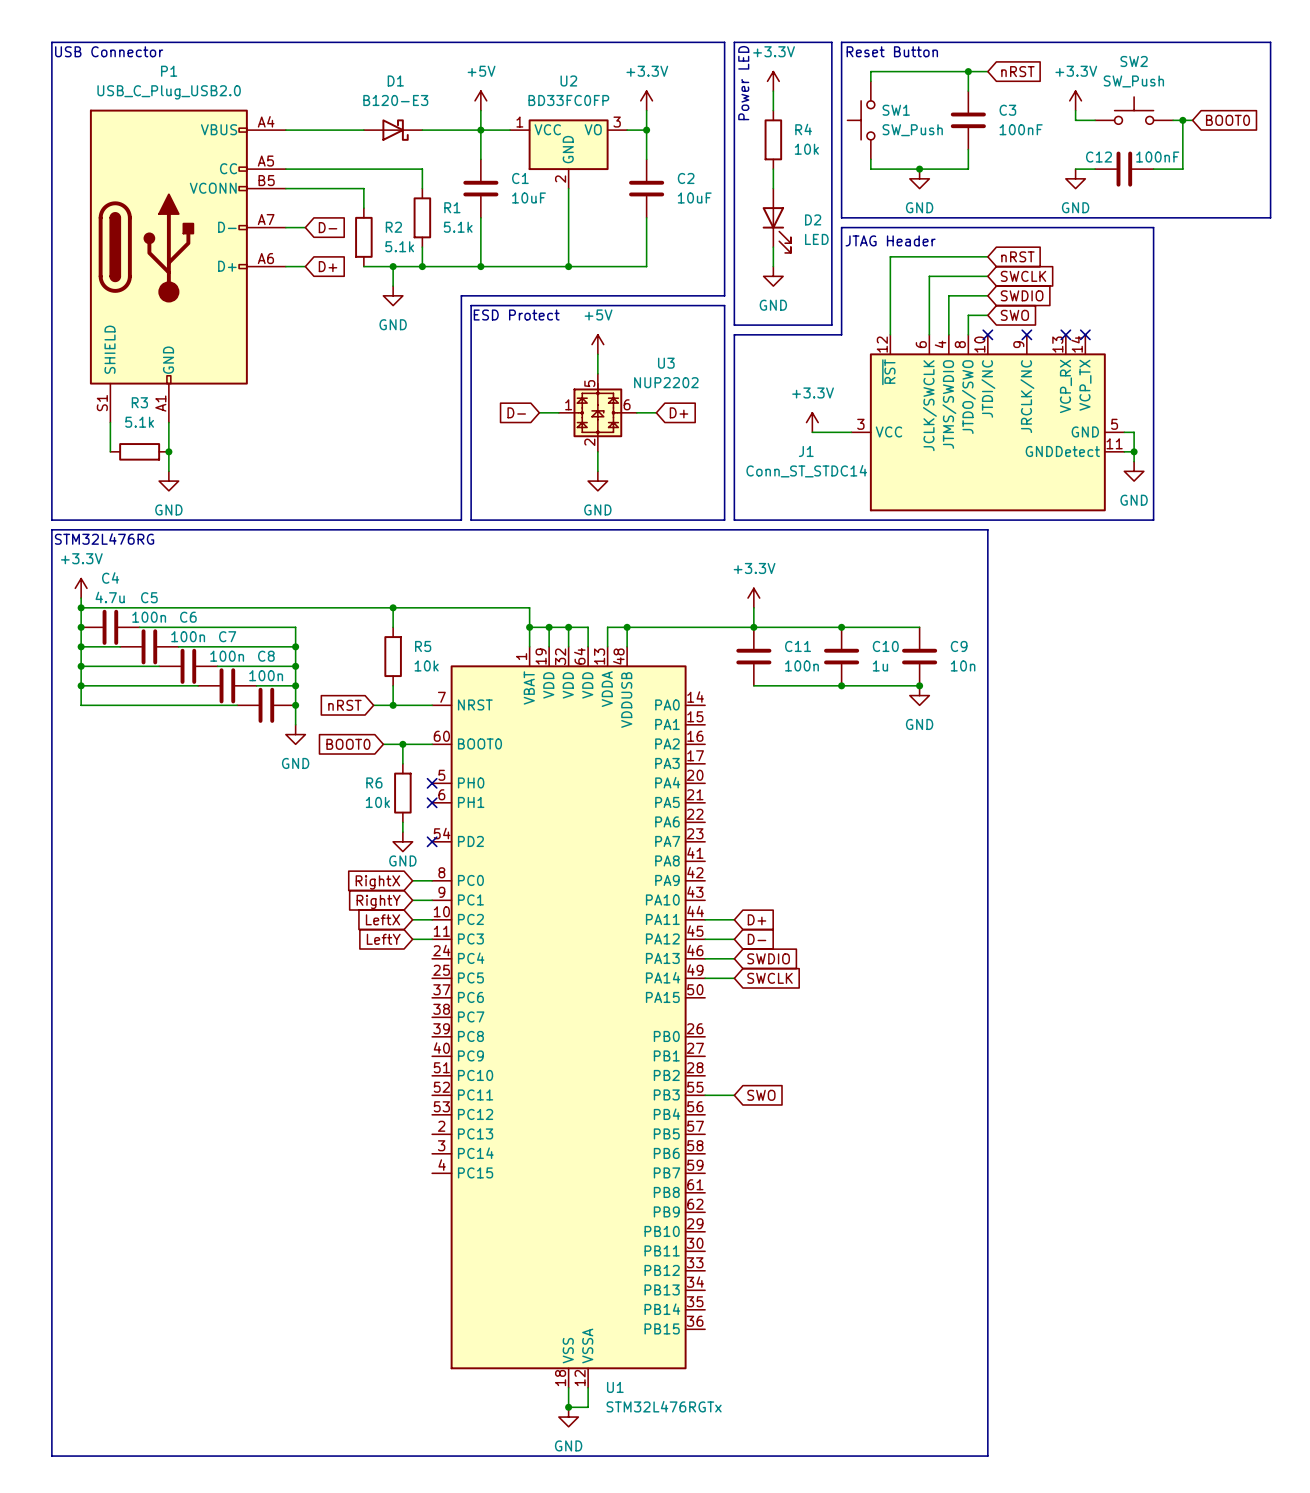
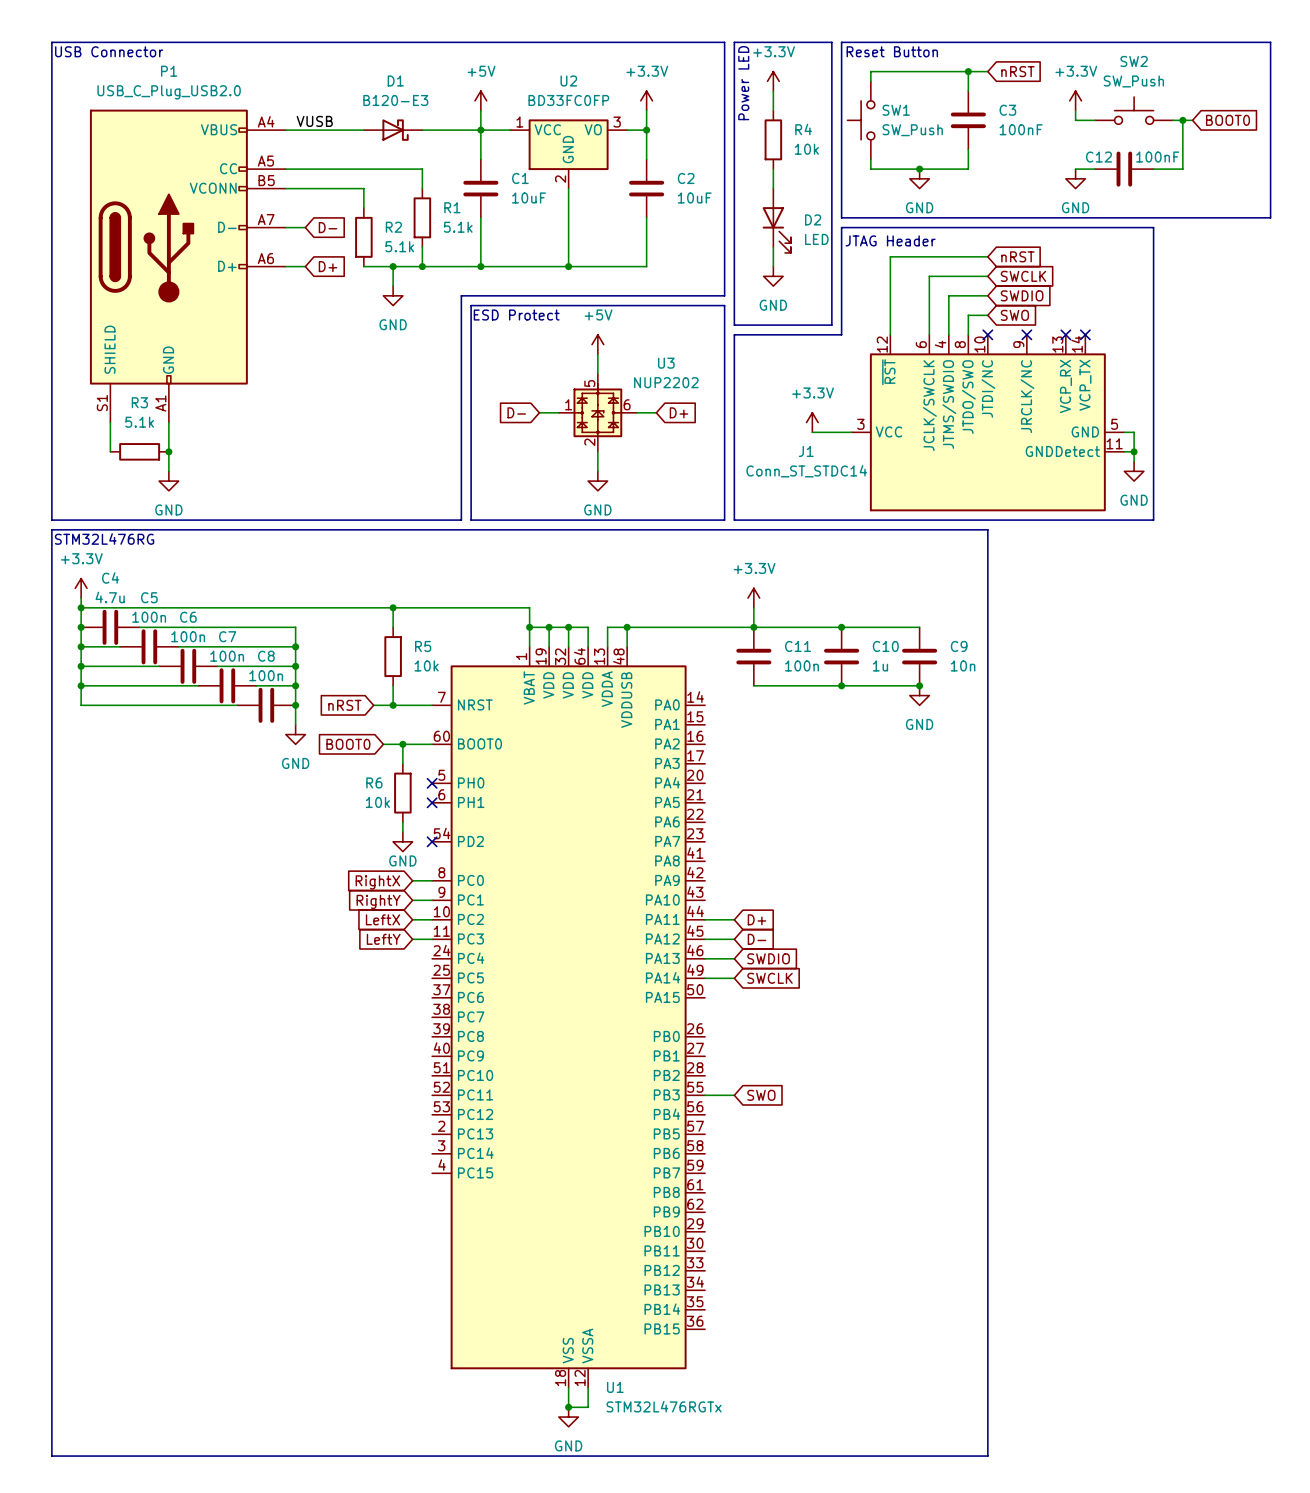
label: none -> VUSB (314, 121)

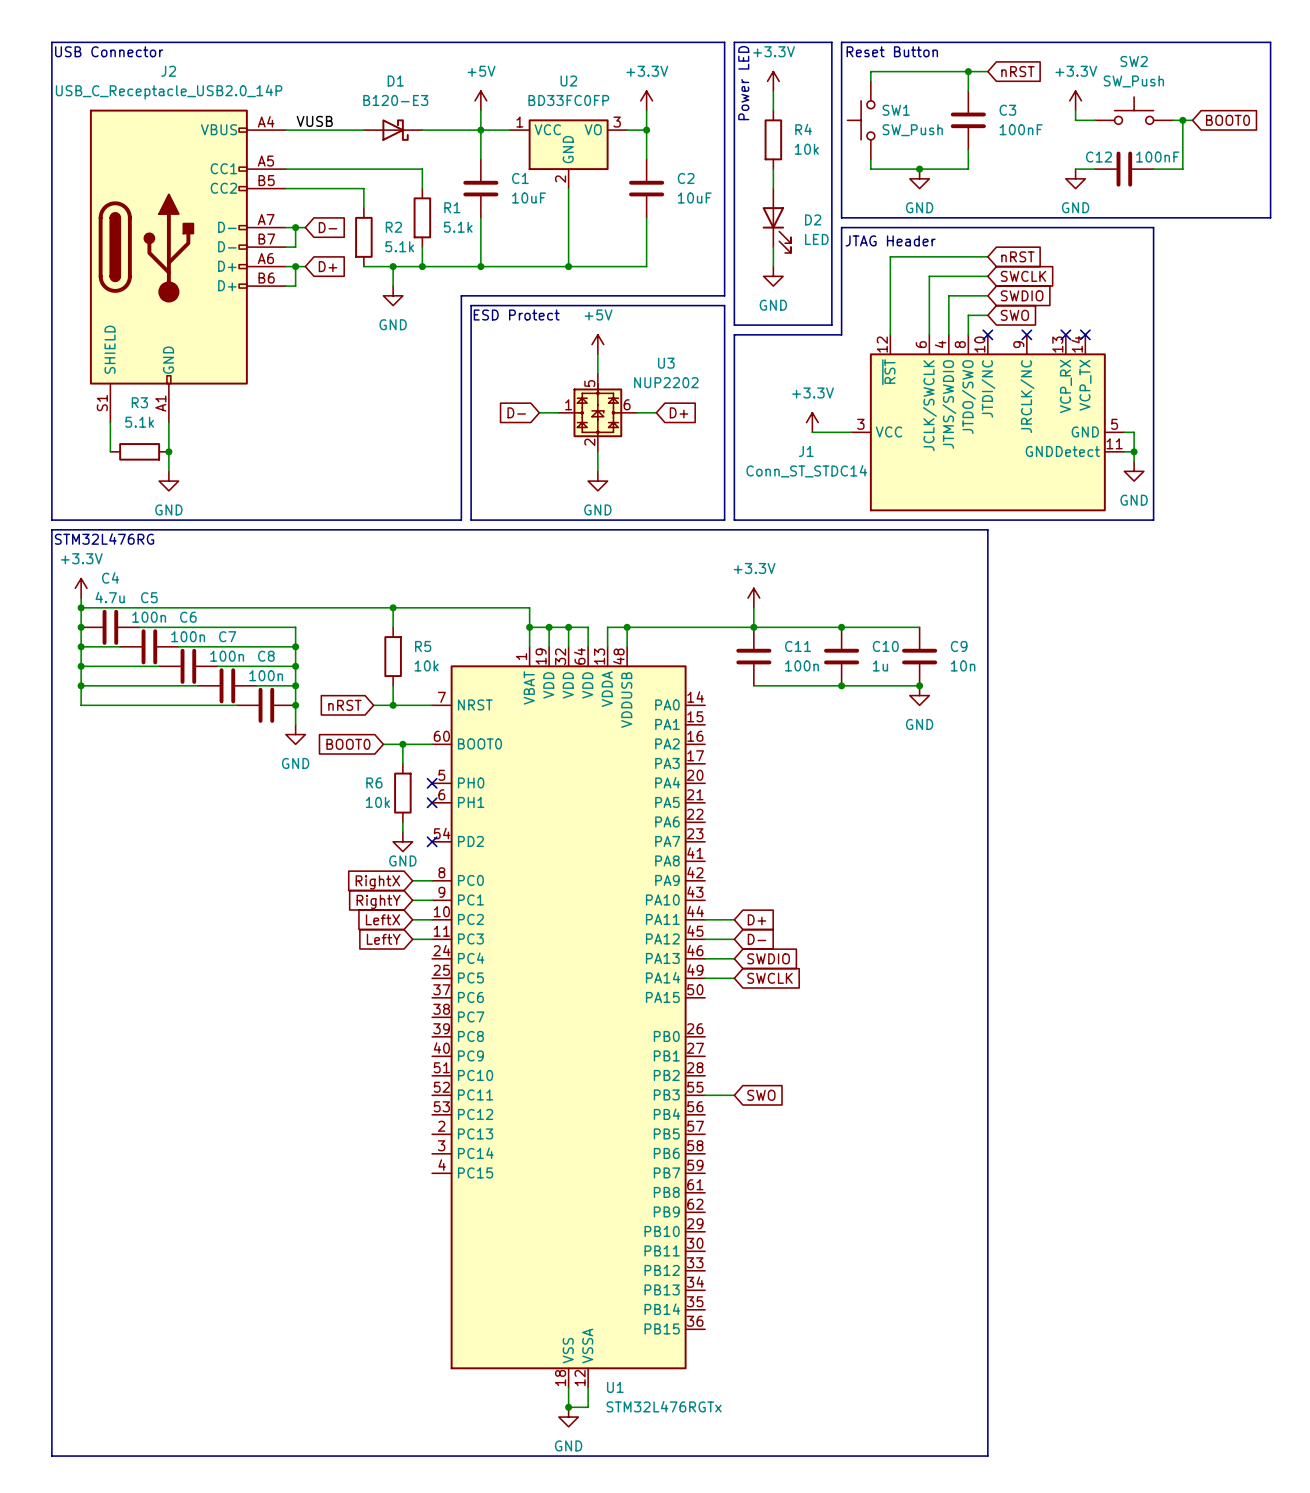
wire: none -> (295, 227) (295, 247) (285, 247)
junction: none -> (295, 227)
P1: USB_C_Plug_USB2.0 (187, 266) -> none
J2: none -> USB_C_Receptacle_USB2.0_14P (187, 266)
wire: none -> (295, 266) (295, 286) (285, 286)
junction: none -> (295, 266)

